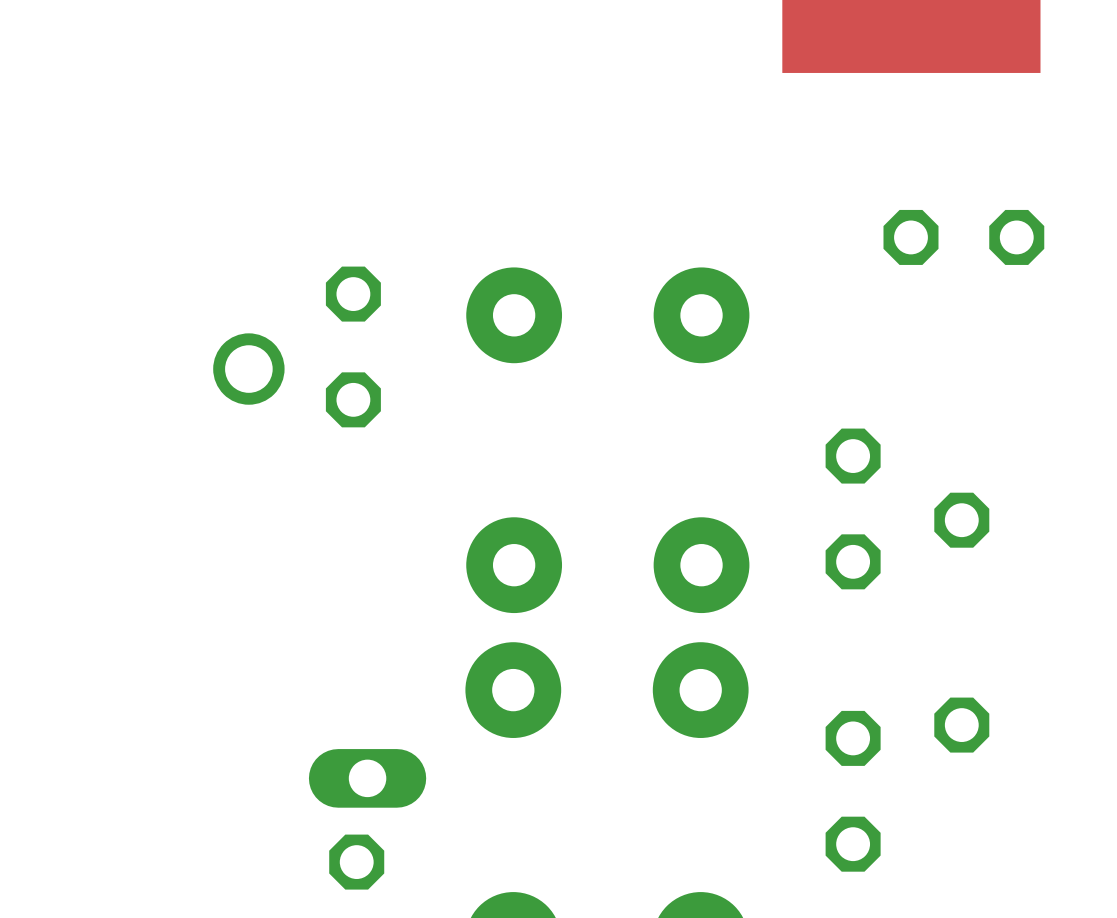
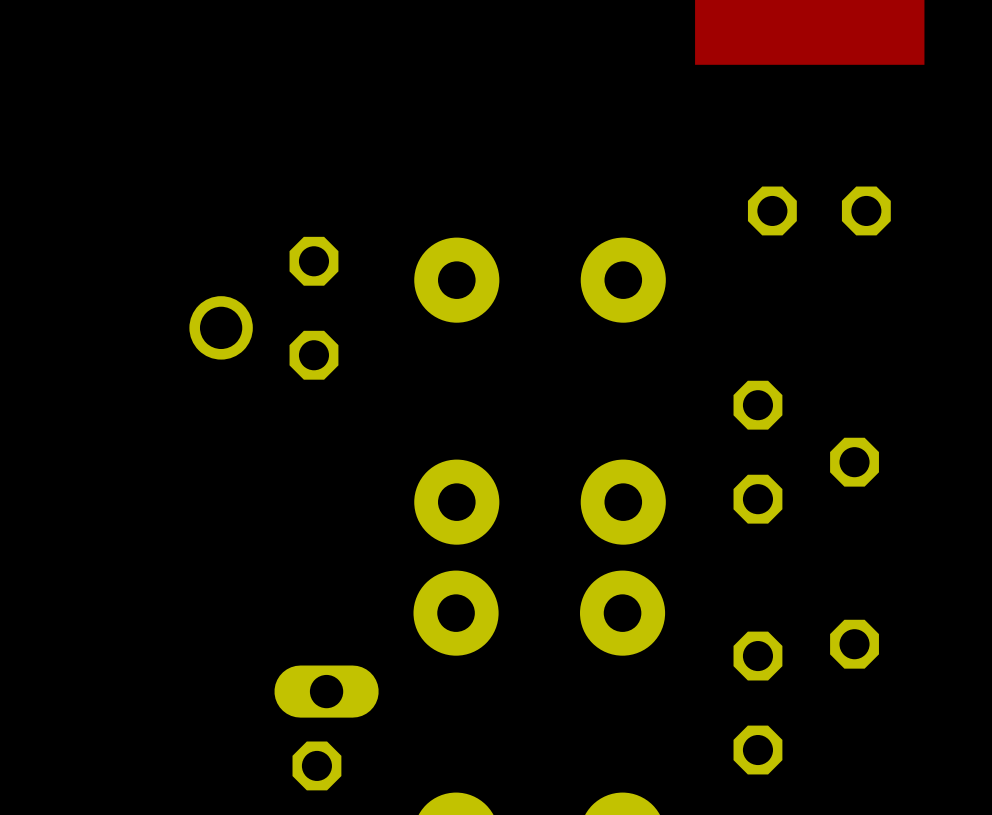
part position: (963, 237) -> (819, 210)

